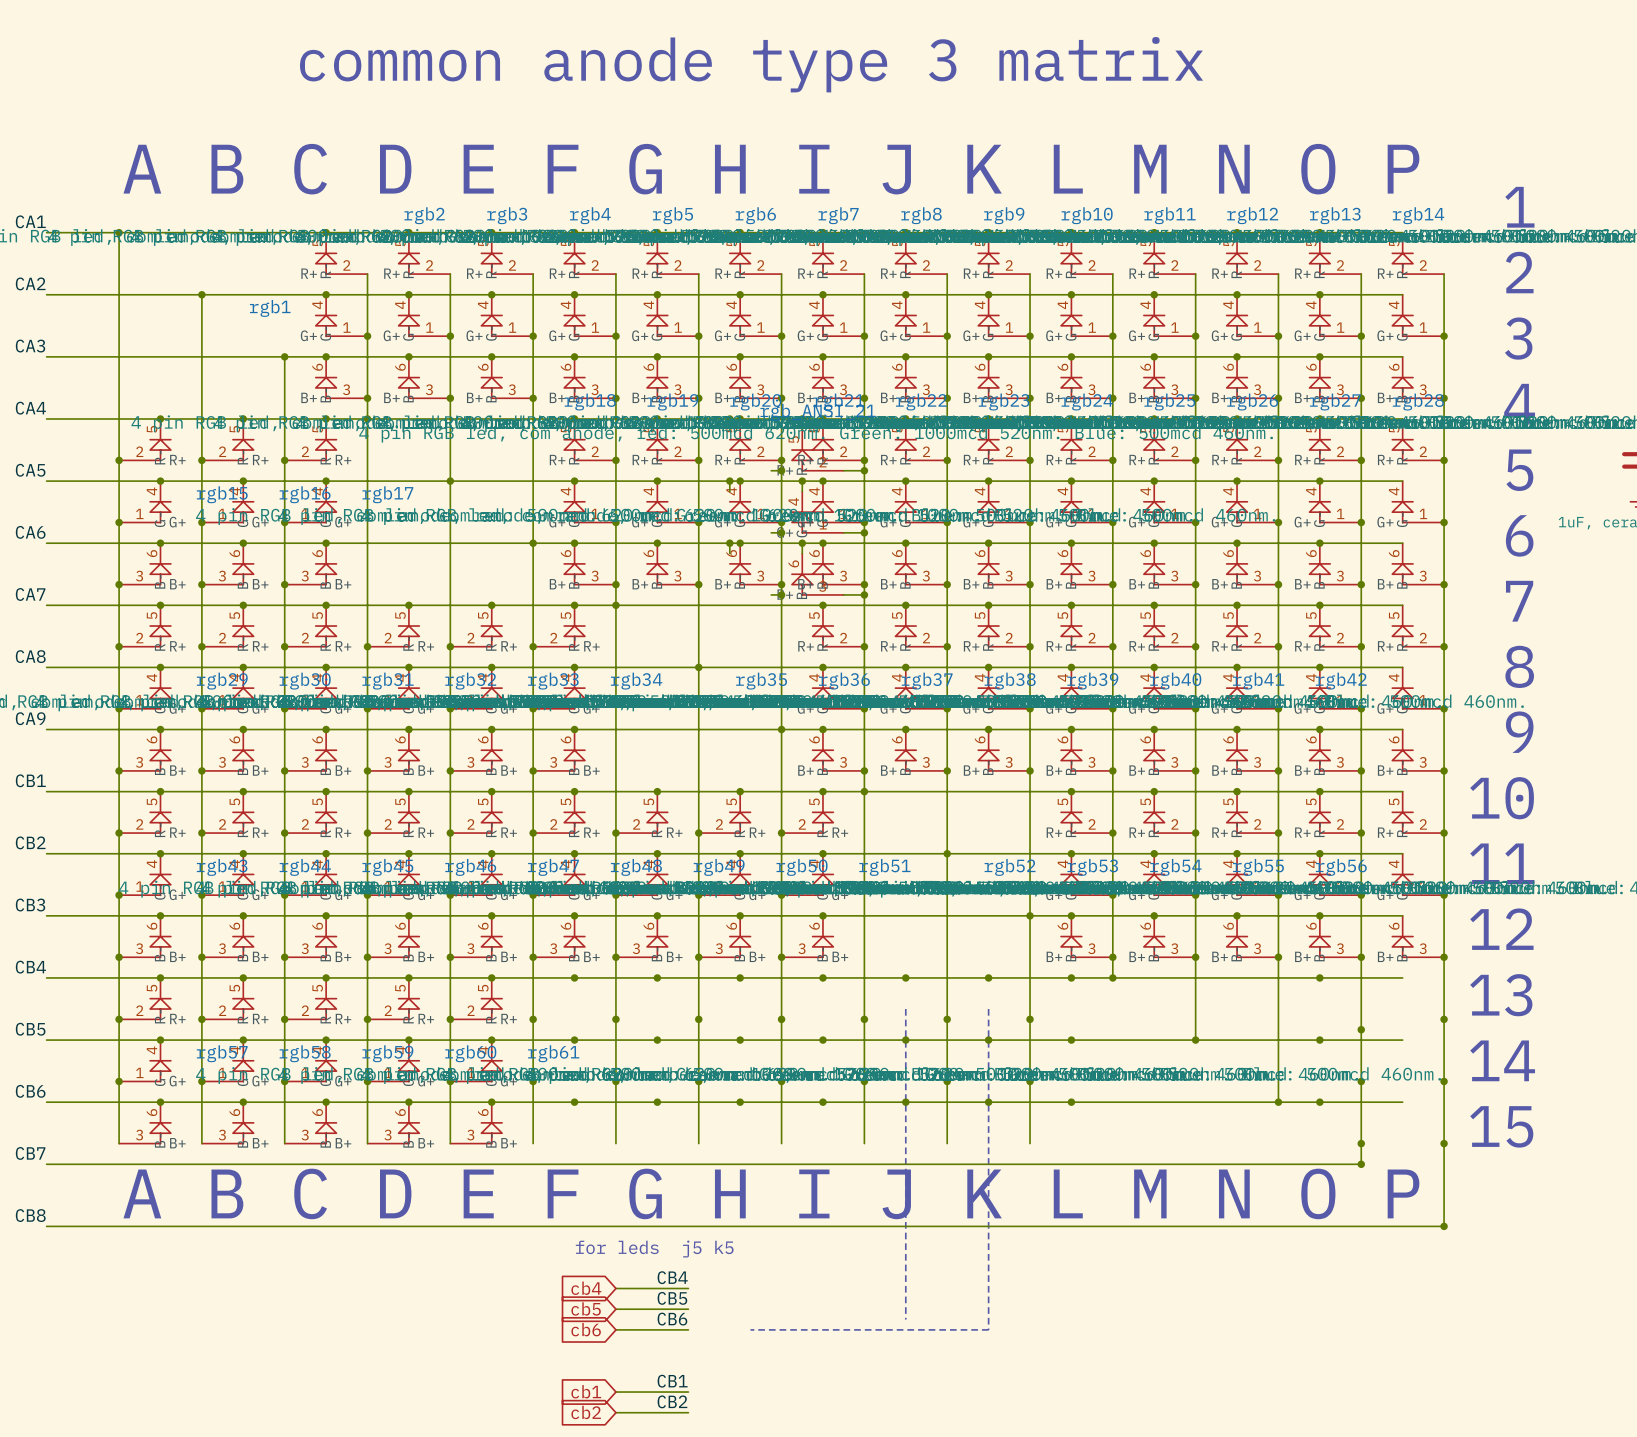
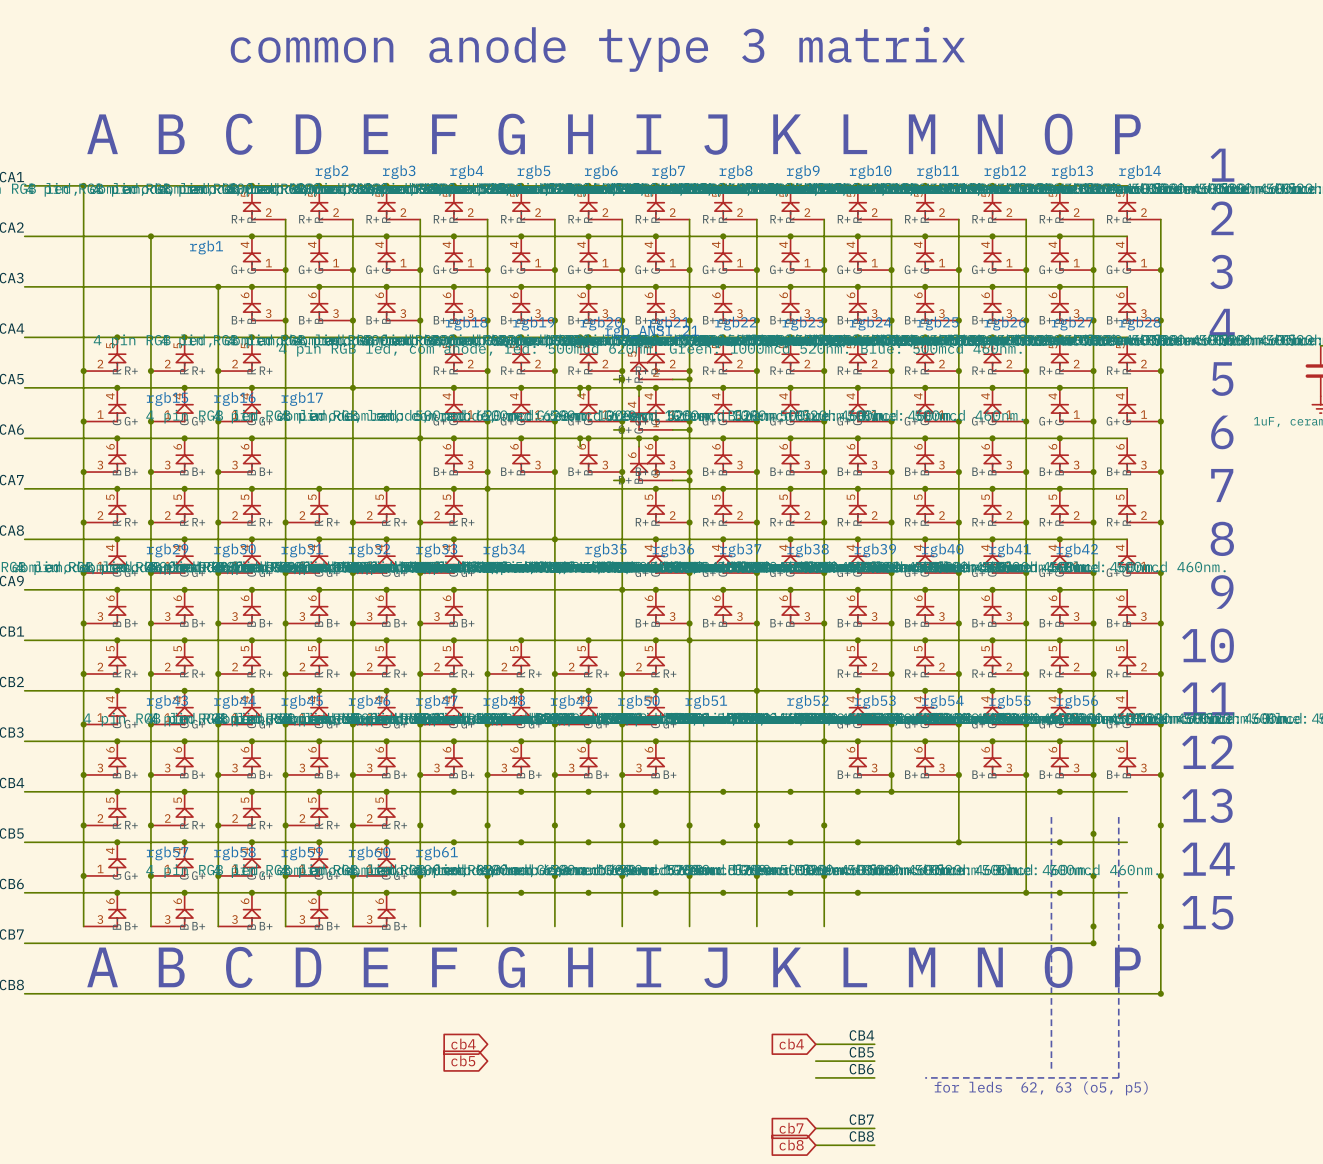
line: (905, 1009) (905, 1319) -> none
line: (988, 1009) (988, 1329) (750, 1329) -> none
line: none -> (1051, 817) (1051, 1069)
line: none -> (1118, 817) (1118, 1077) (925, 1077)
text: for leds j5 k5 (654, 1249) -> none
label: CB4 (672, 1277) -> none
label: none -> CB4 (861, 1035)
wire: (615, 1288) (688, 1288) -> none
global label: none -> cb4 (791, 1044)
wire: none -> (815, 1044) (874, 1044)
label: CB5 (672, 1298) -> none
label: none -> CB5 (861, 1052)
wire: (615, 1309) (688, 1309) -> none
wire: none -> (815, 1061) (874, 1061)
label: CB6 (672, 1319) -> none
label: none -> CB6 (861, 1069)
global label: cb6 (586, 1329) -> none
wire: (615, 1329) (688, 1329) -> none
wire: none -> (815, 1077) (874, 1077)
text: none -> for leds 62, 63 (o5, p5) (1041, 1088)
label: CB1 (672, 1381) -> none
label: none -> CB7 (861, 1119)
global label: cb1 (586, 1391) -> none
global label: none -> cb7 (791, 1128)
wire: (615, 1392) (688, 1392) -> none
wire: none -> (815, 1128) (874, 1128)
label: CB2 (672, 1401) -> none
label: none -> CB8 (861, 1136)
global label: cb2 (586, 1412) -> none
wire: (615, 1412) (688, 1412) -> none
global label: none -> cb8 (791, 1145)
wire: none -> (815, 1145) (874, 1145)

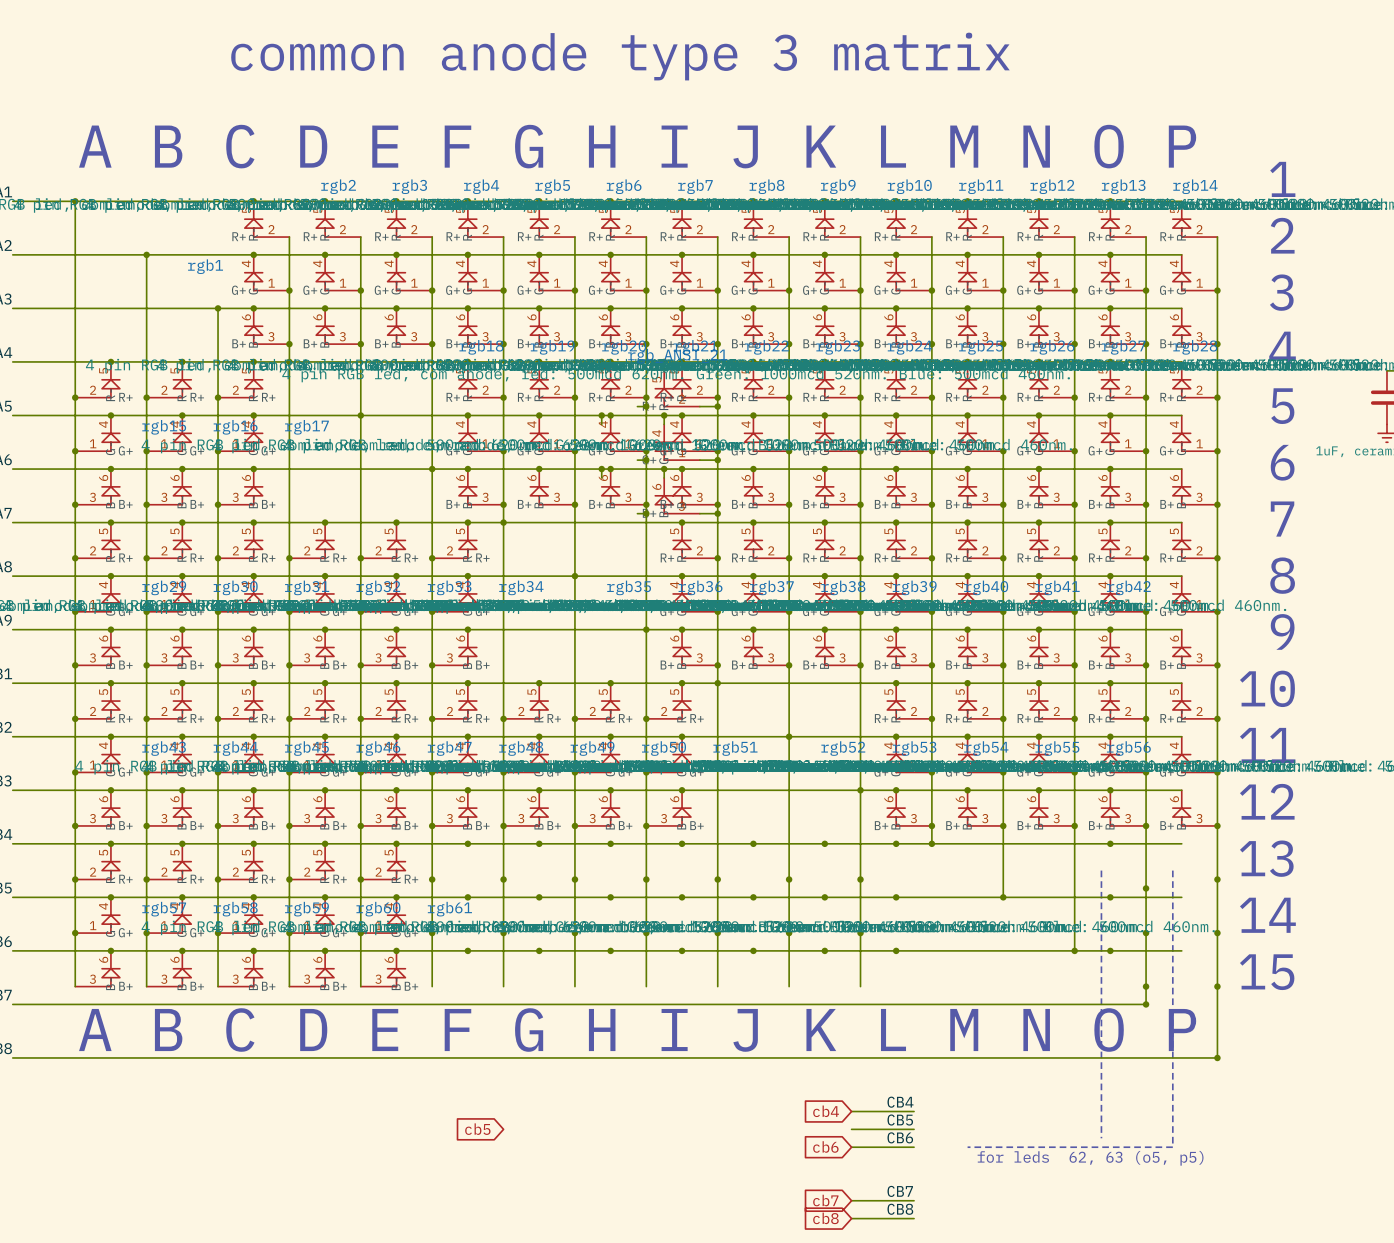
global label: cb4 (463, 1044) -> none
global label: none -> cb6 (825, 1146)

